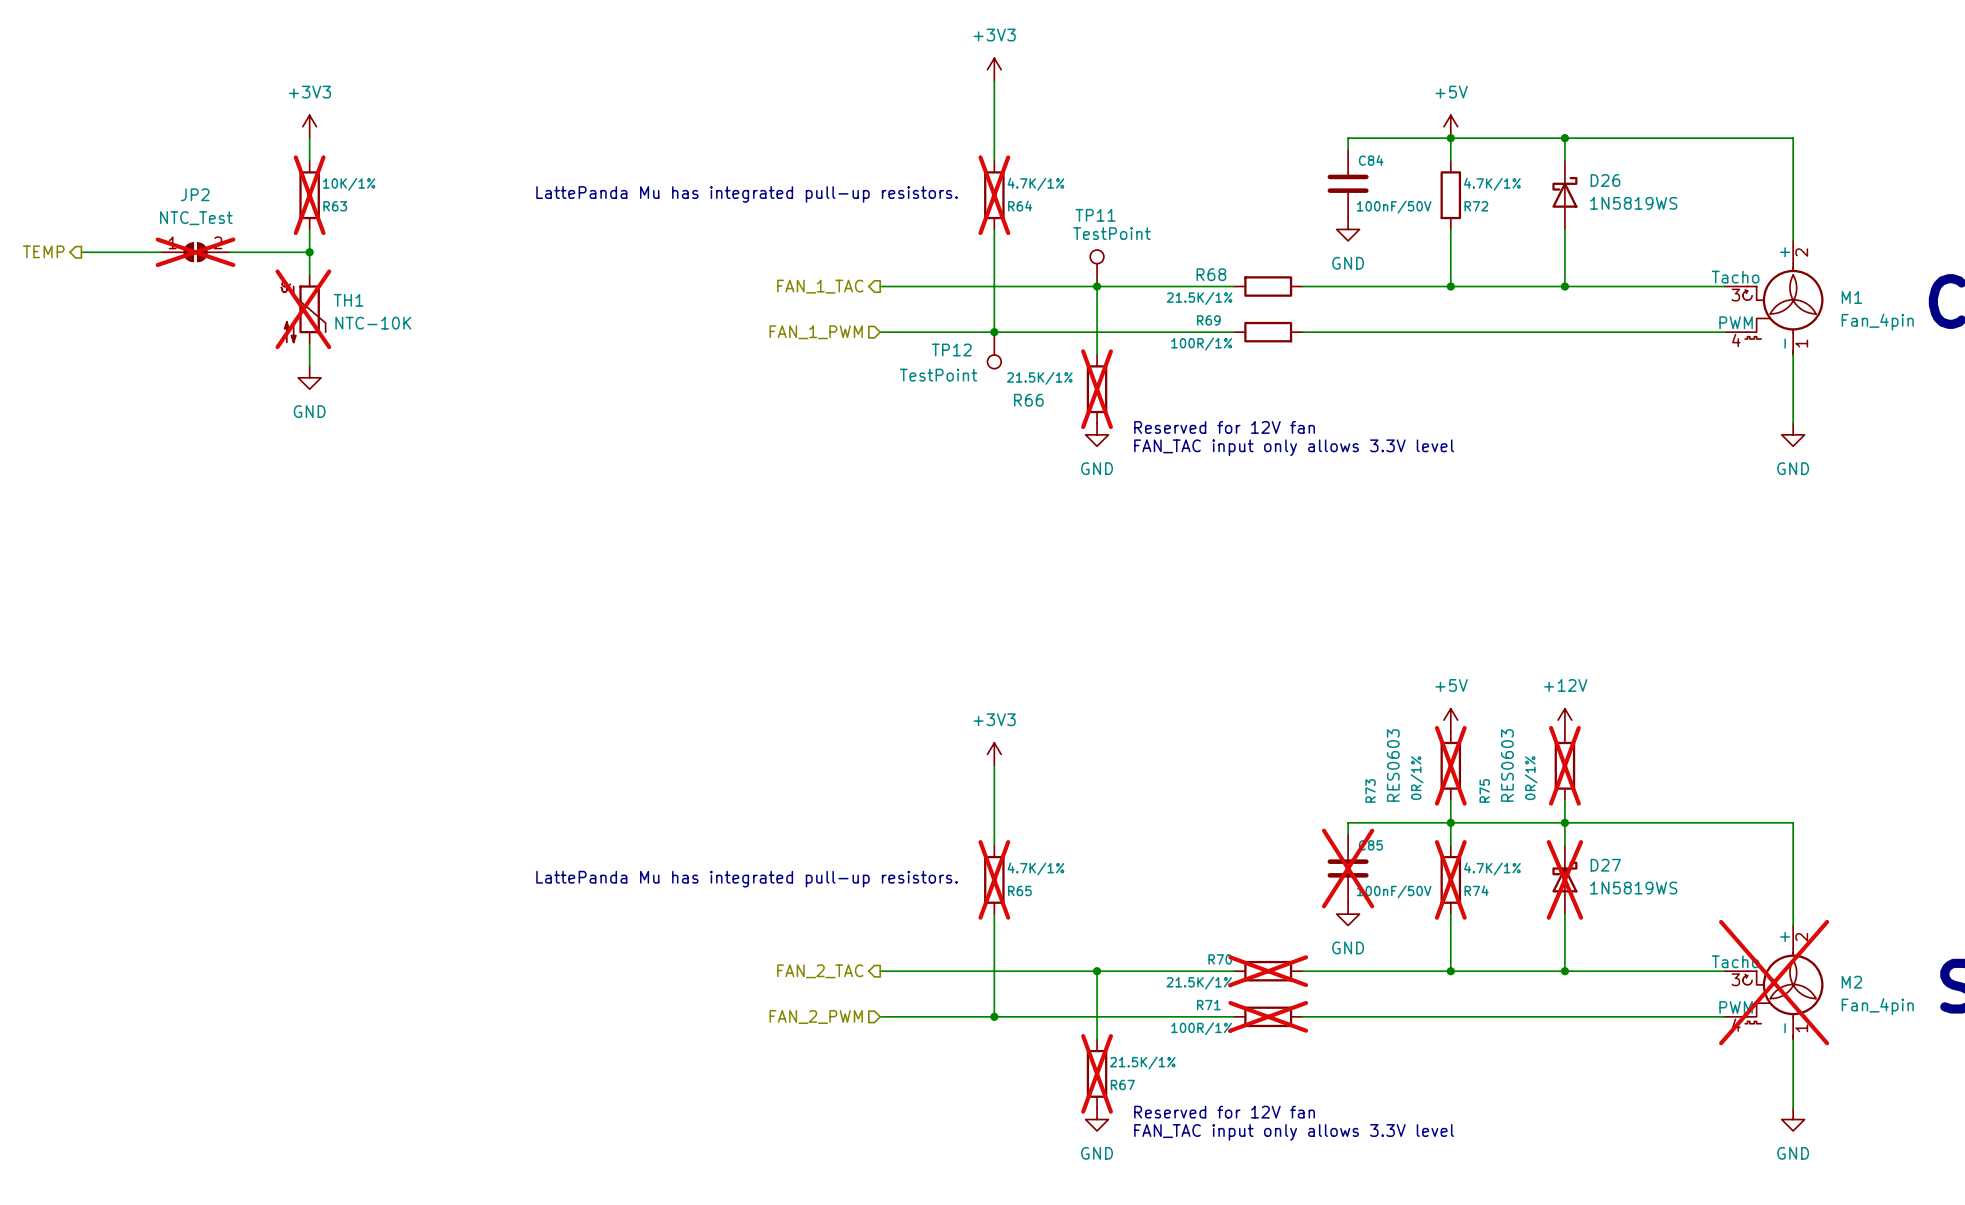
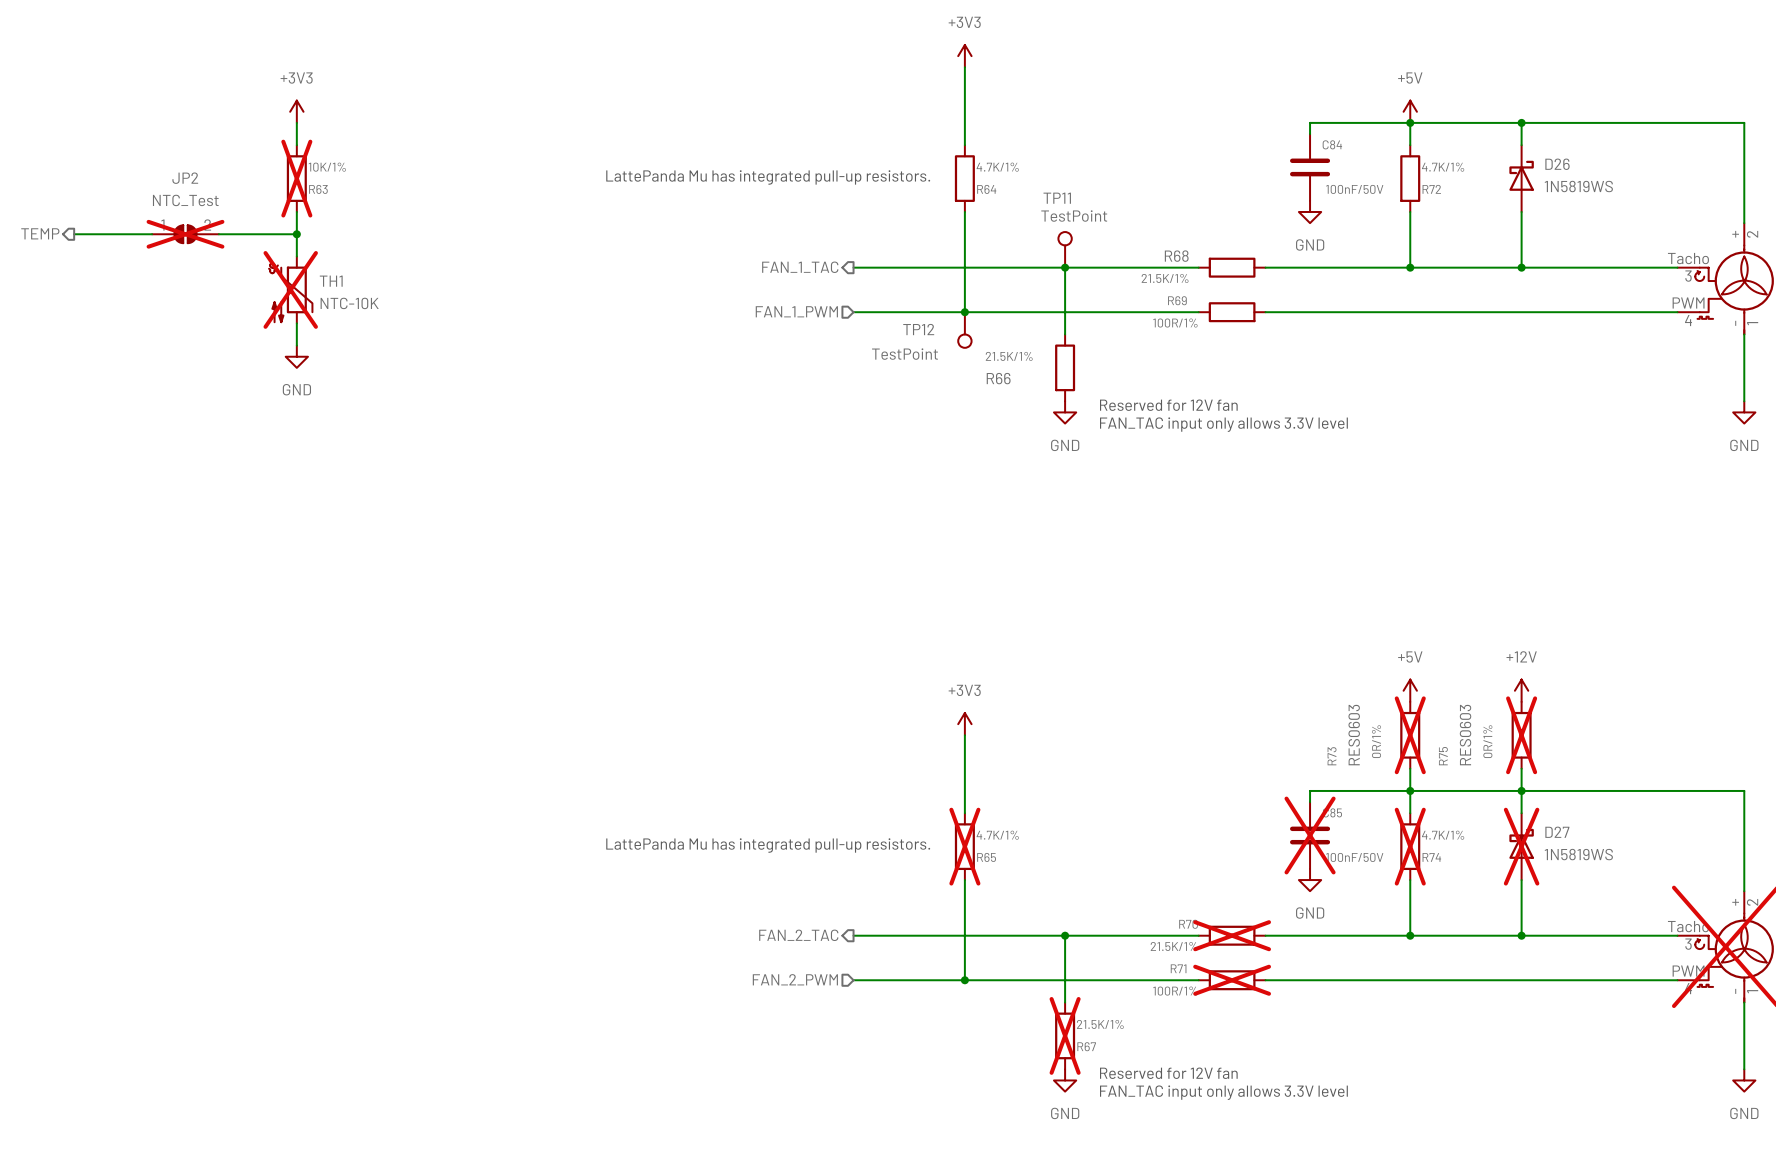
R64 do-not-place cross: (994, 195) -> none
R66 do-not-place cross: (1097, 389) -> none

